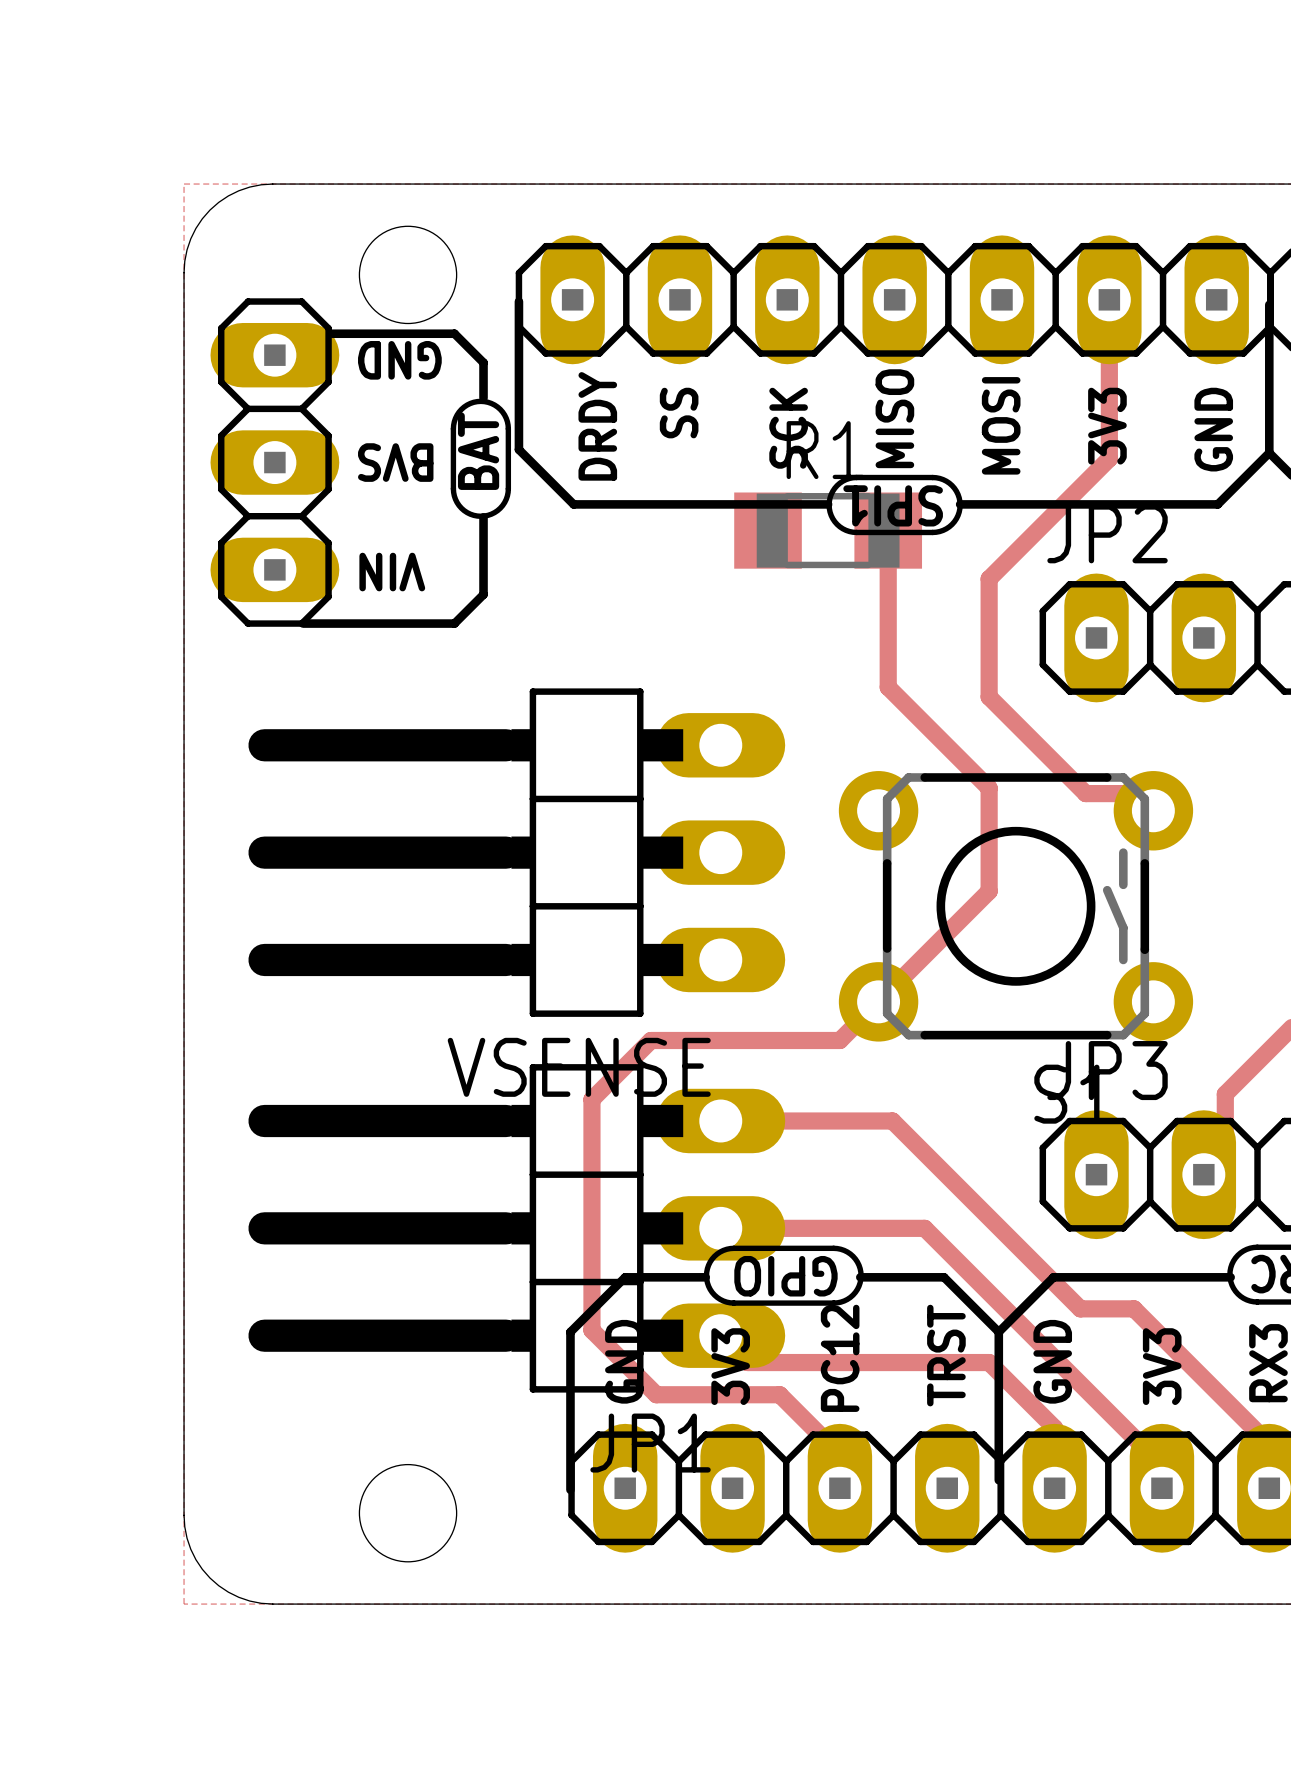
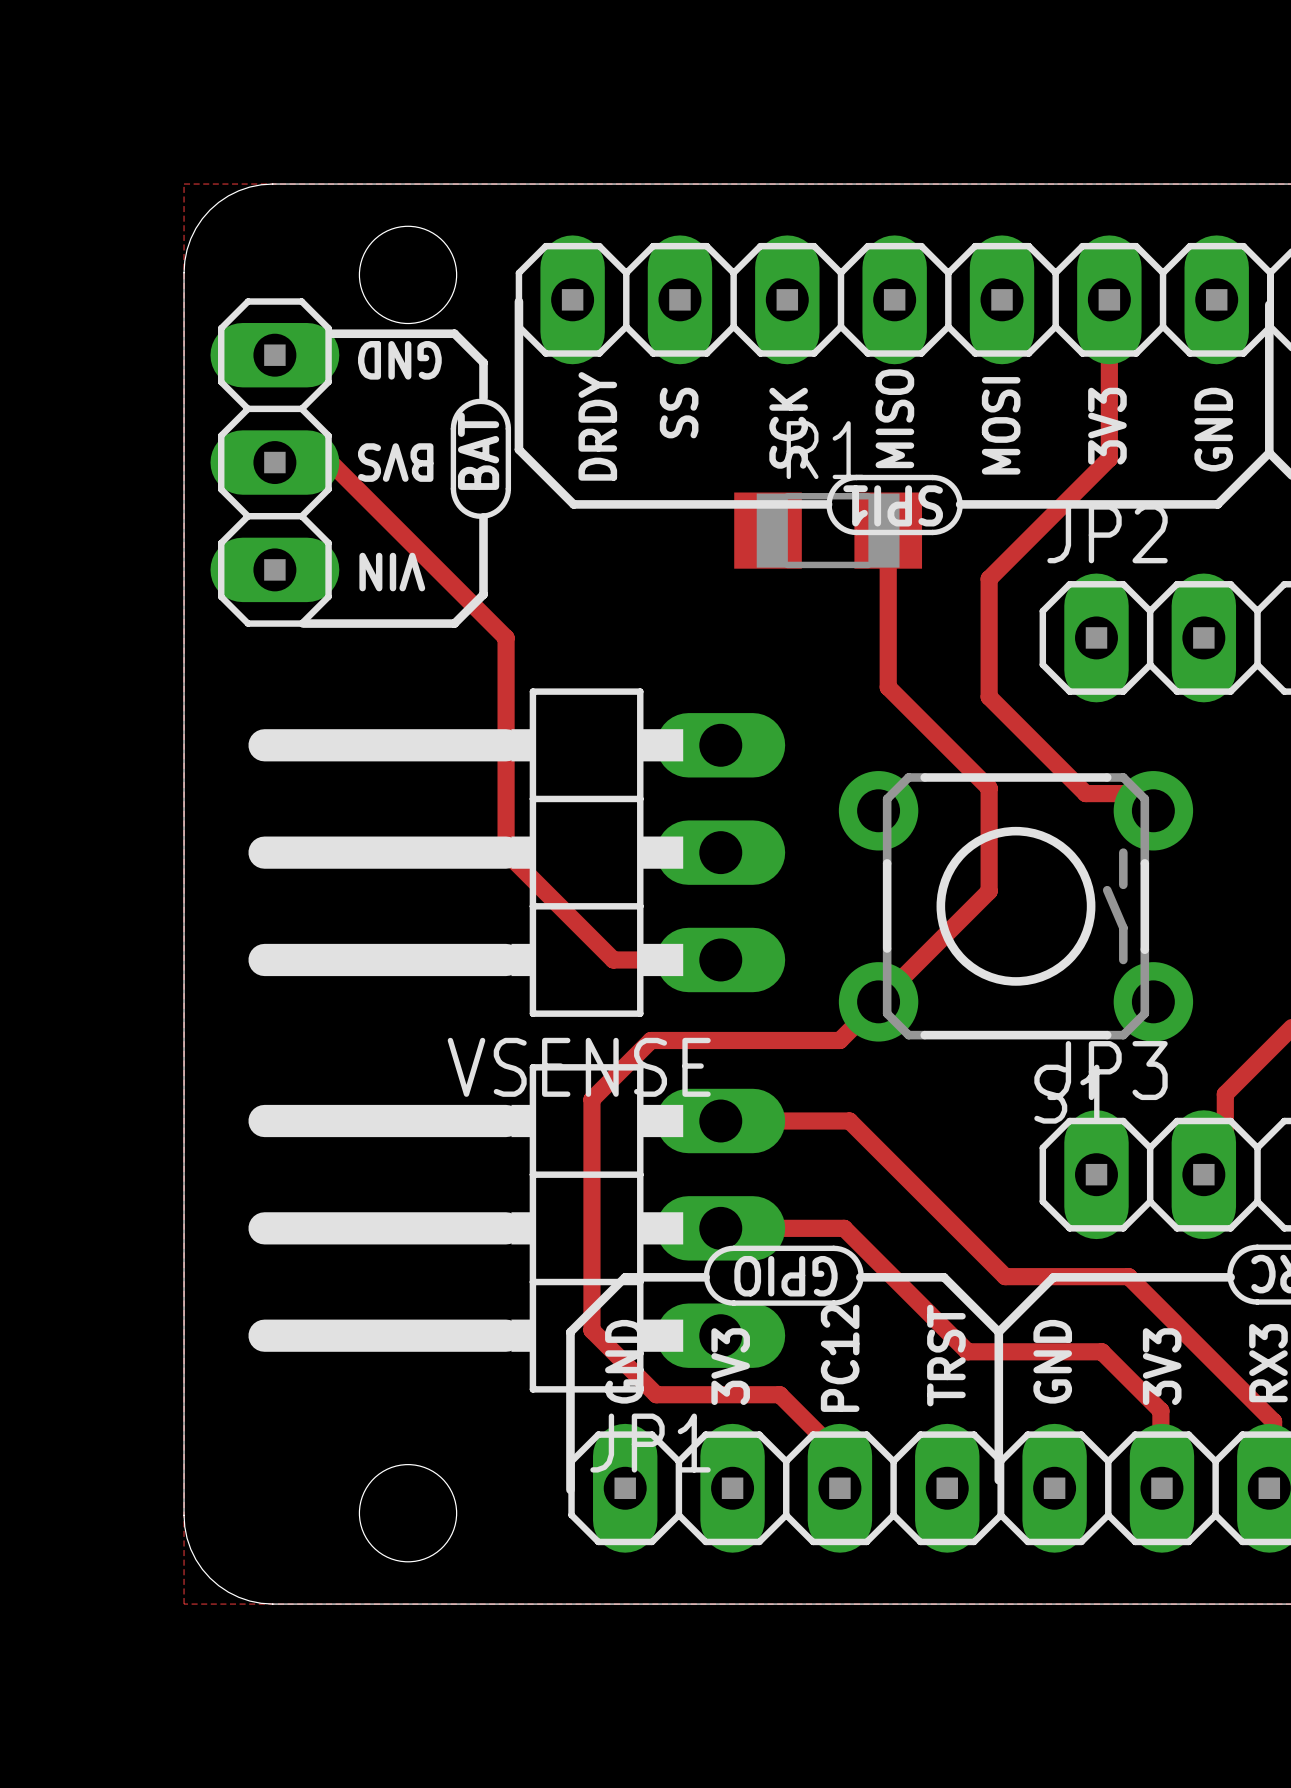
track: none -> (274, 462) (330, 462) (506, 637) (506, 852) (613, 959) (720, 959)
track: (849, 1121) (892, 1121) (1080, 1308) (1134, 1308) (1269, 1444) (1269, 1488) -> (849, 1121) (1005, 1276) (1128, 1276) (1273, 1421) (1273, 1483) (1269, 1488)
track: (844, 1228) (924, 1228) (1161, 1465) (1161, 1488) -> (844, 1228) (967, 1351) (1101, 1351) (1160, 1410) (1161, 1488)
track: (720, 1335) (747, 1362) (989, 1362) (1054, 1428) (1054, 1488) -> none

